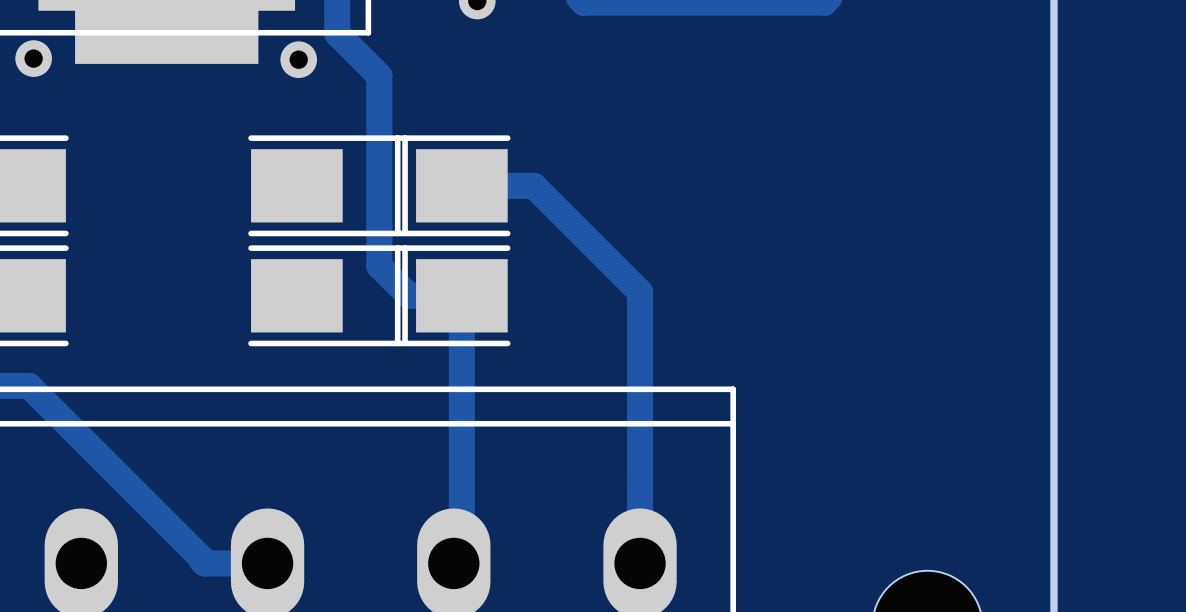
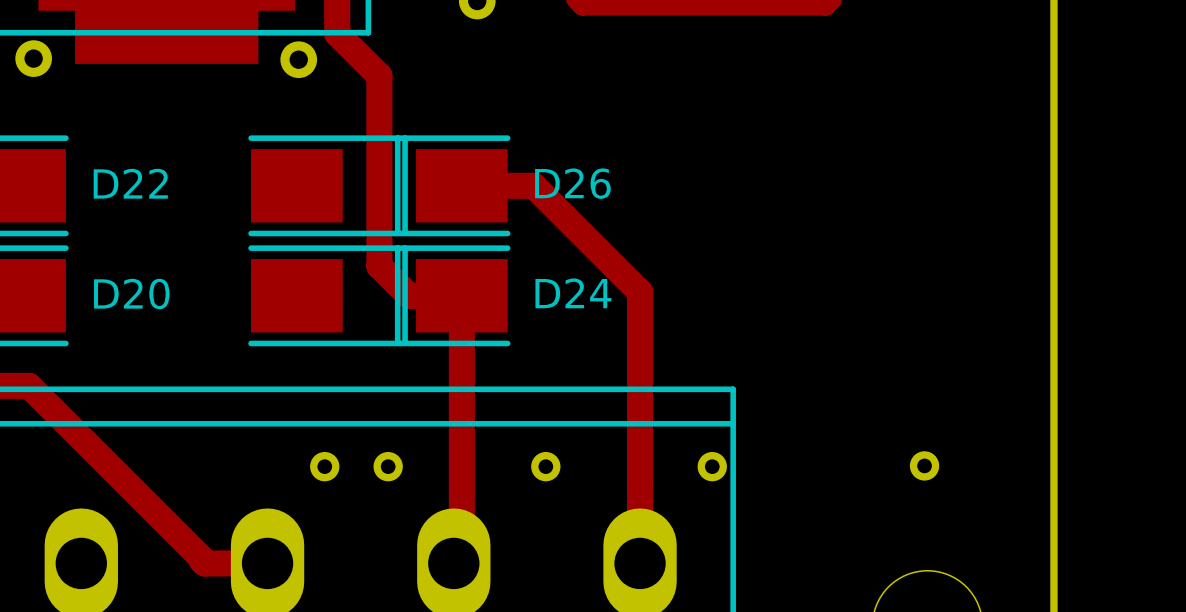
D22 name: none -> D22 (130, 183)
D26 name: none -> D26 (572, 183)
D20 name: none -> D20 (131, 293)
D24 name: none -> D24 (573, 293)
part: none -> (924, 465)
part: none -> (324, 466)
part: none -> (388, 466)
part: none -> (545, 466)
part: none -> (712, 466)

